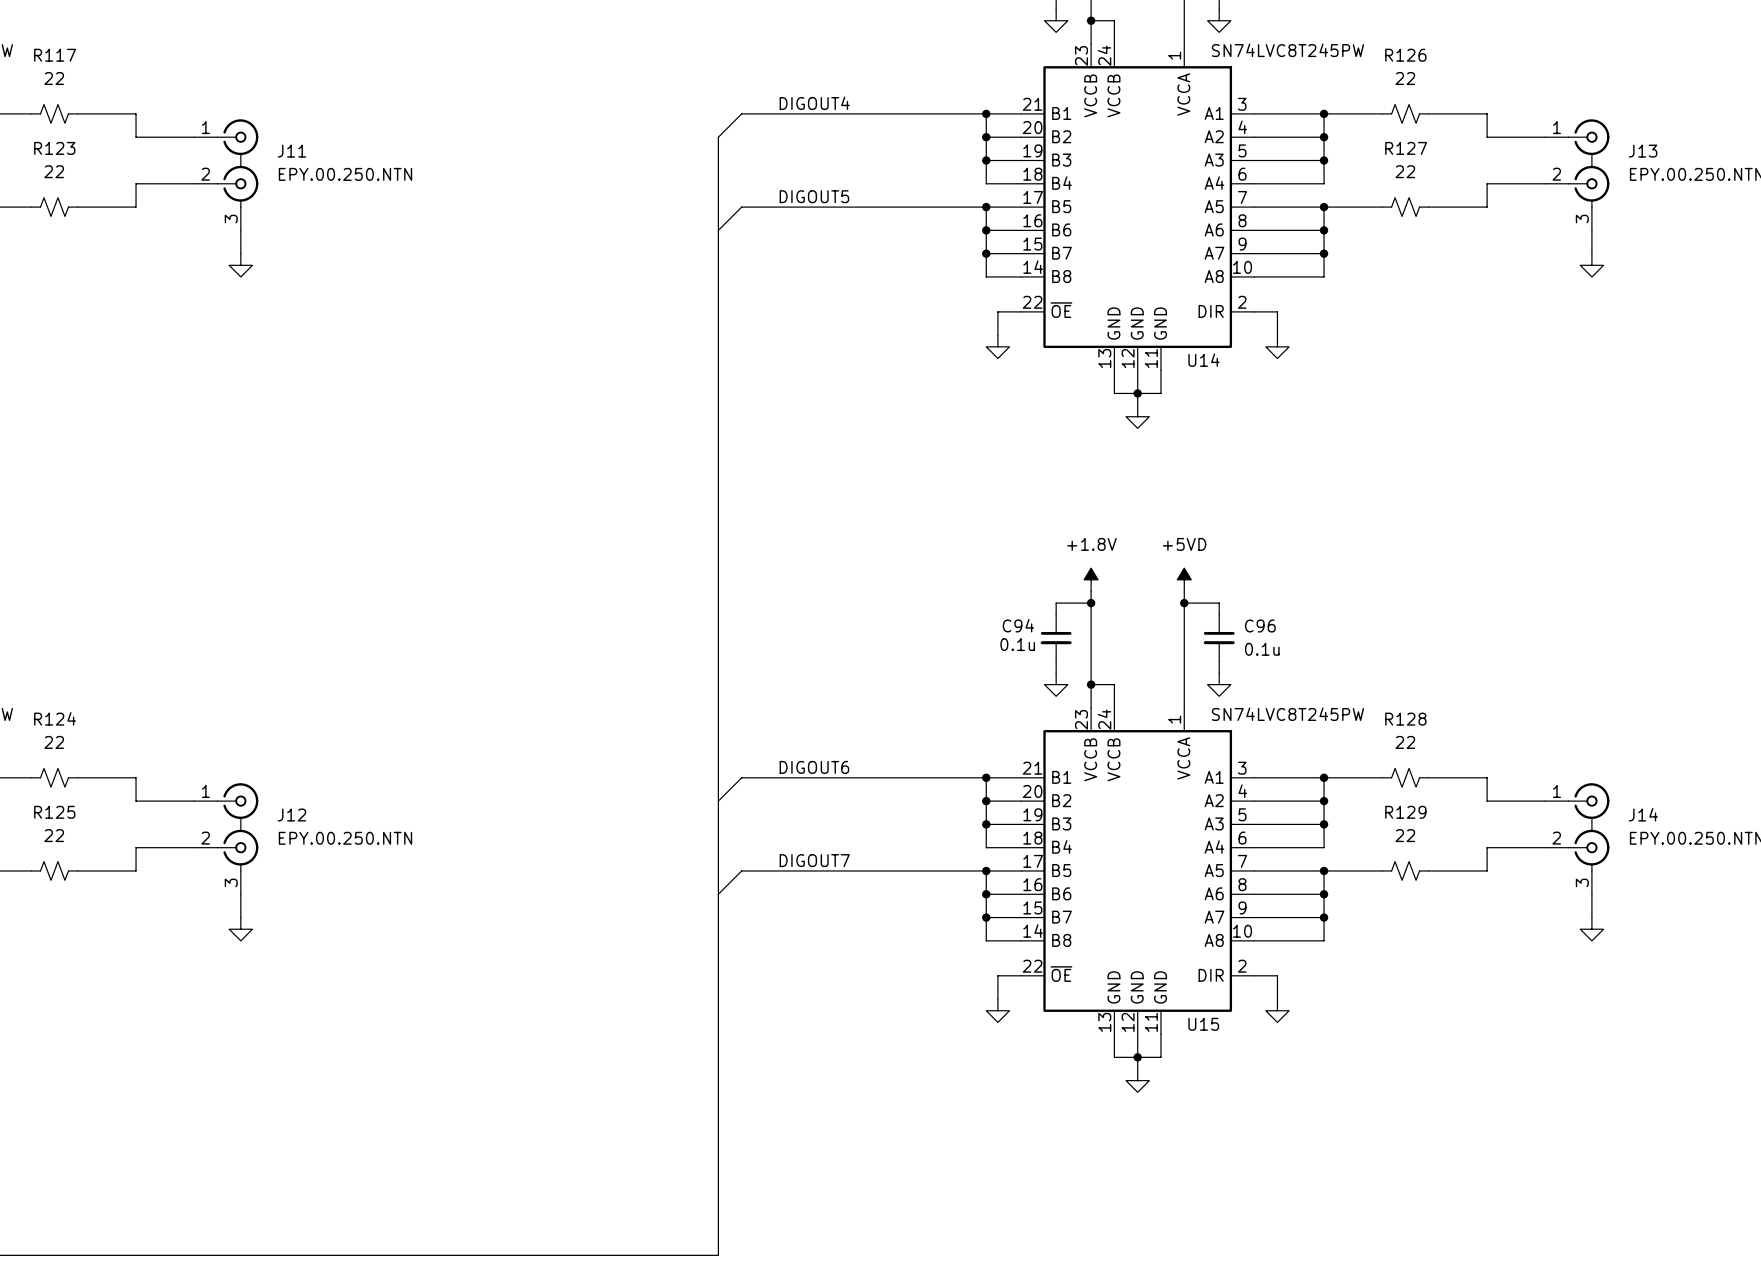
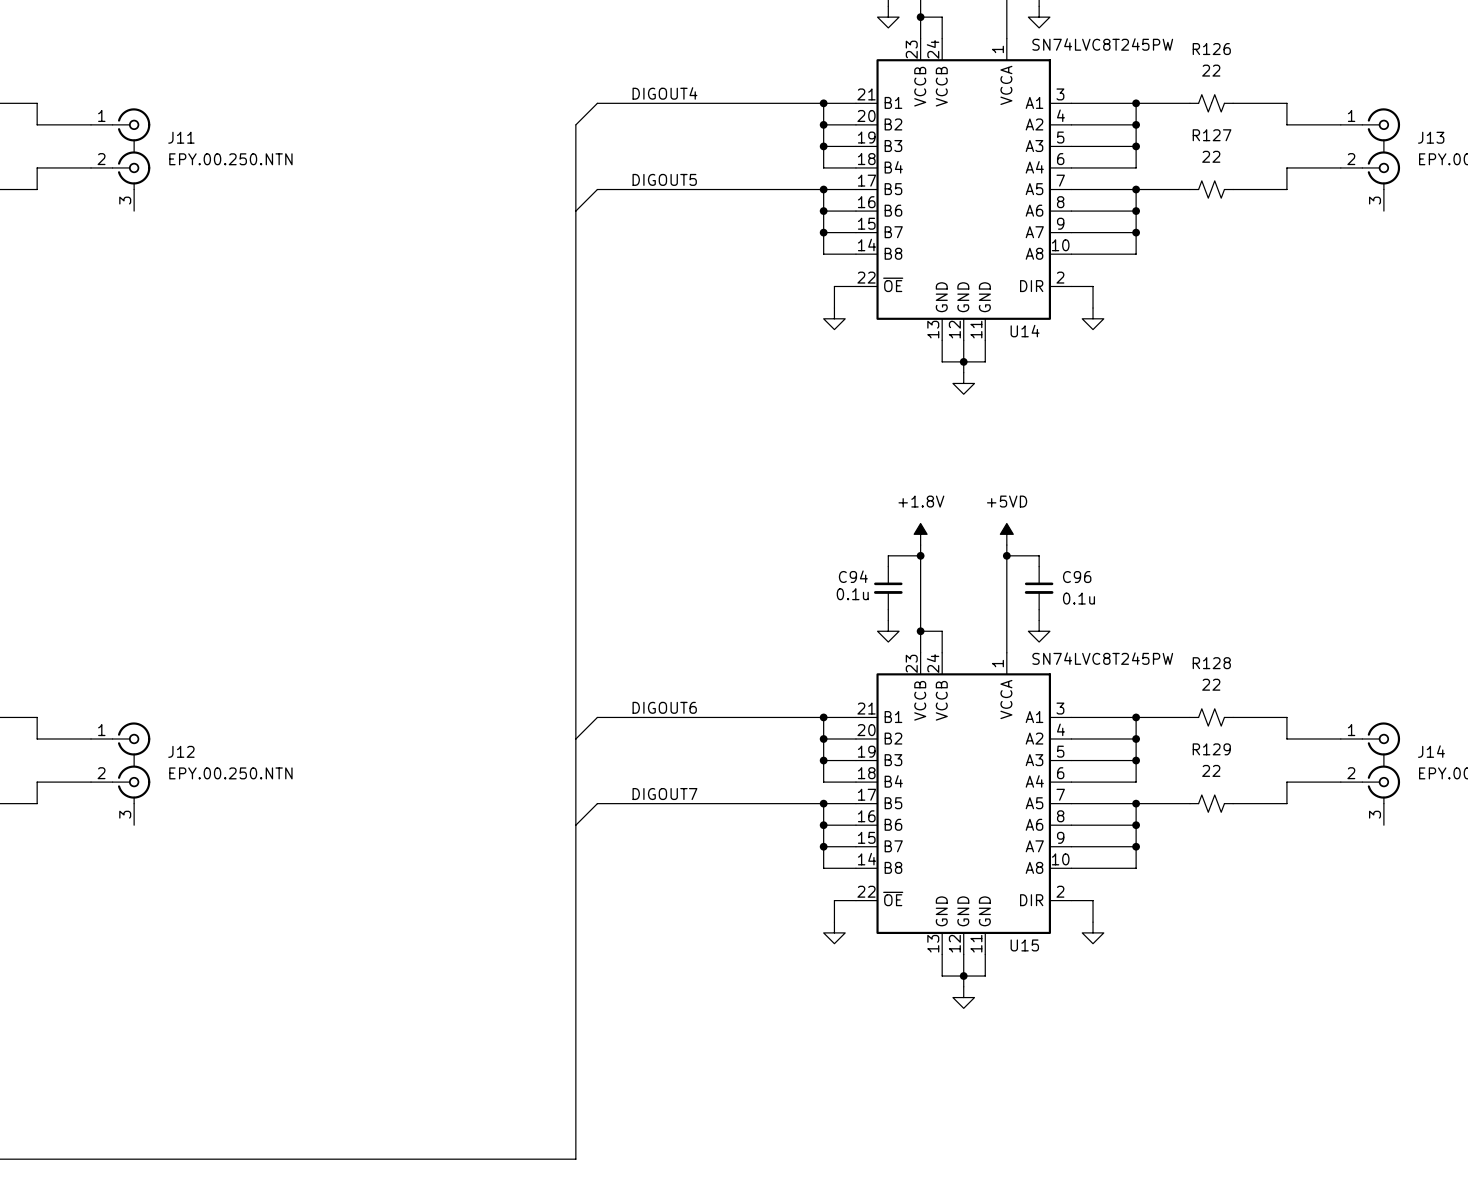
wire: (240, 230) (240, 253) -> none
wire: (1591, 230) (1591, 253) -> none
power symbol: (240, 265) -> none
power symbol: (1591, 265) -> none
wire: (240, 894) (240, 917) -> none
wire: (1591, 894) (1591, 917) -> none
power symbol: (240, 929) -> none
power symbol: (1591, 929) -> none

